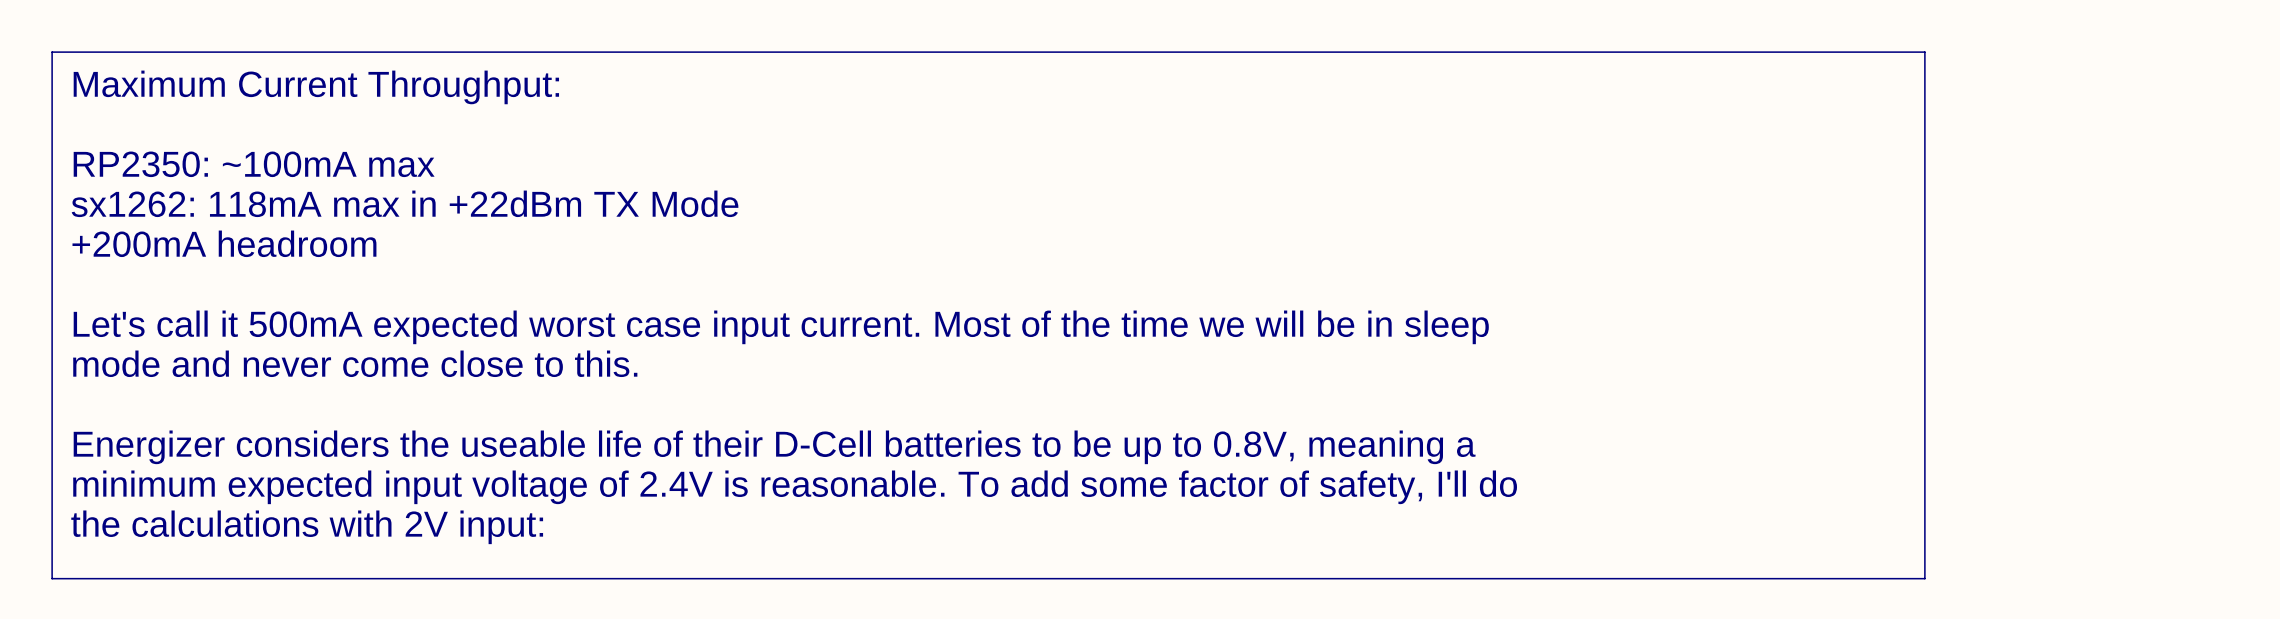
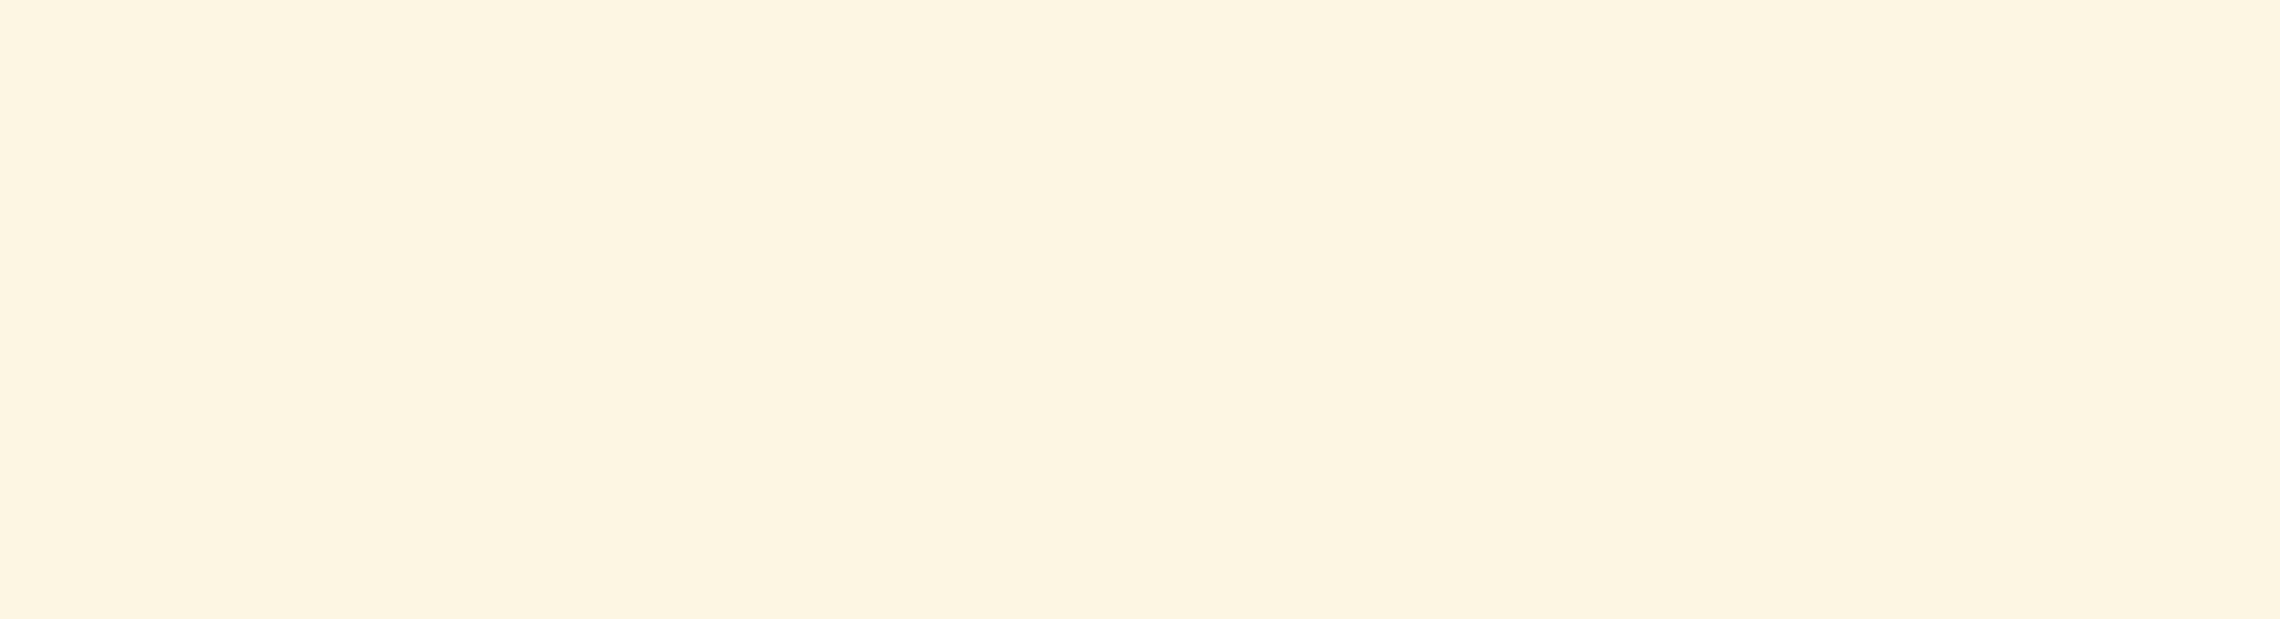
line: (52, 52) (1924, 52) (1924, 578) (52, 578) (52, 52) -> none
text: Maximum Current Throughput: (316, 87) -> none
text: RP2350: ~100mA max (254, 164) -> none
text: sx1262: 118mA max in +22dBm TX Mode (405, 203) -> none
text: +200mA headroom (224, 243) -> none
text: Let's call it 500mA expected worst case input current. Most of the time we will be in sleep (781, 327) -> none
text: mode and never come close to this. (355, 363) -> none
text: Energizer considers the useable life of their D-Cell batteries to be up to 0.8V, meaning a (774, 447) -> none
text: minimum expected input voltage of 2.4V is reasonable. To add some factor of safety, I'll do (795, 487) -> none
text: the calculations with 2V input: (307, 527) -> none

